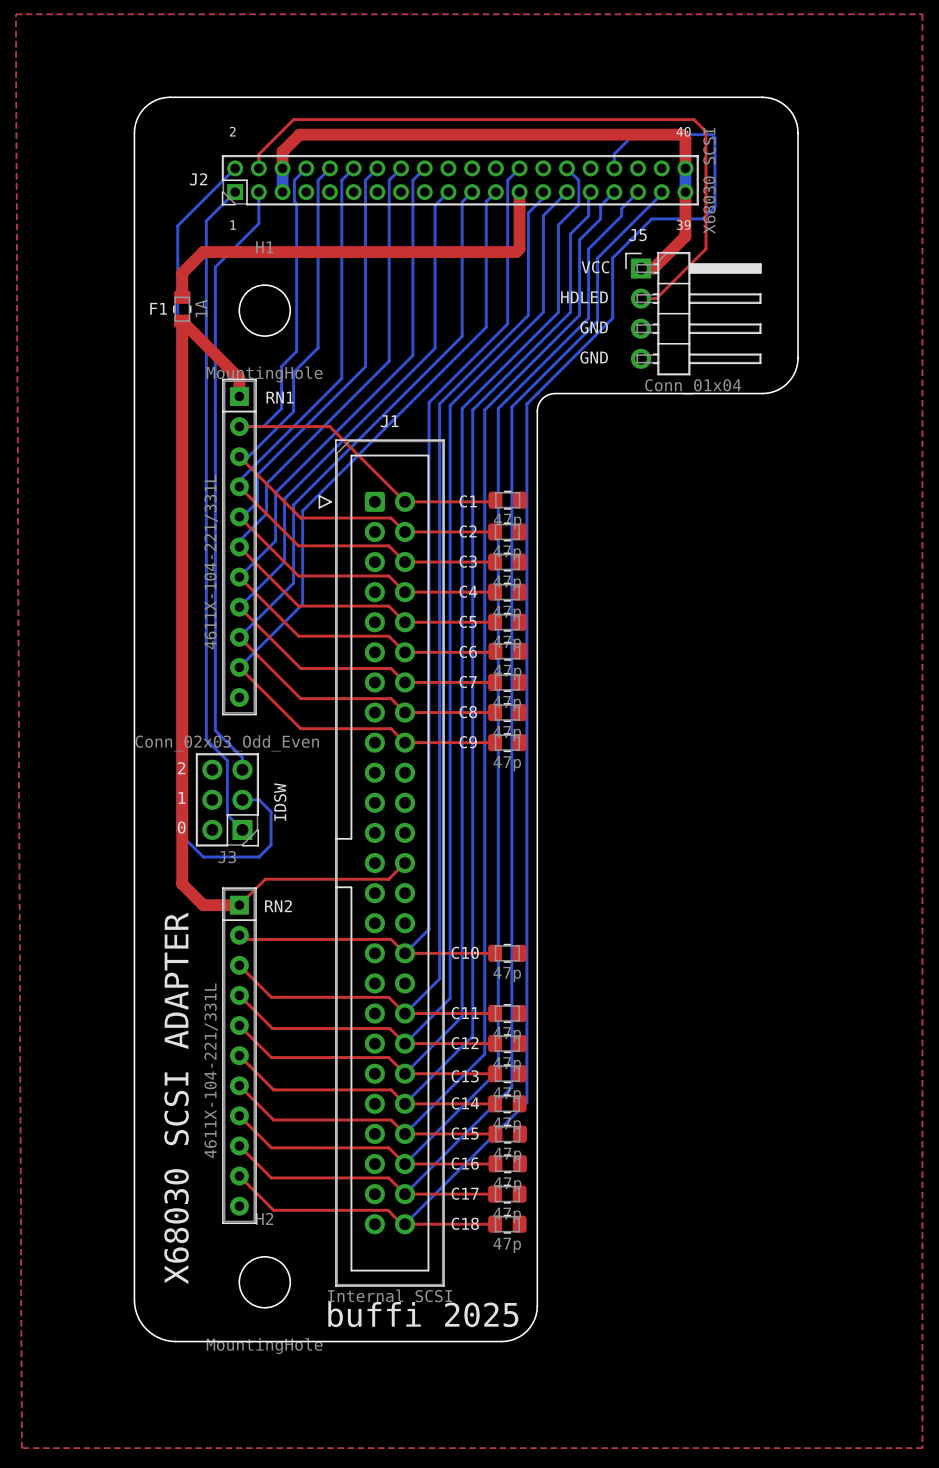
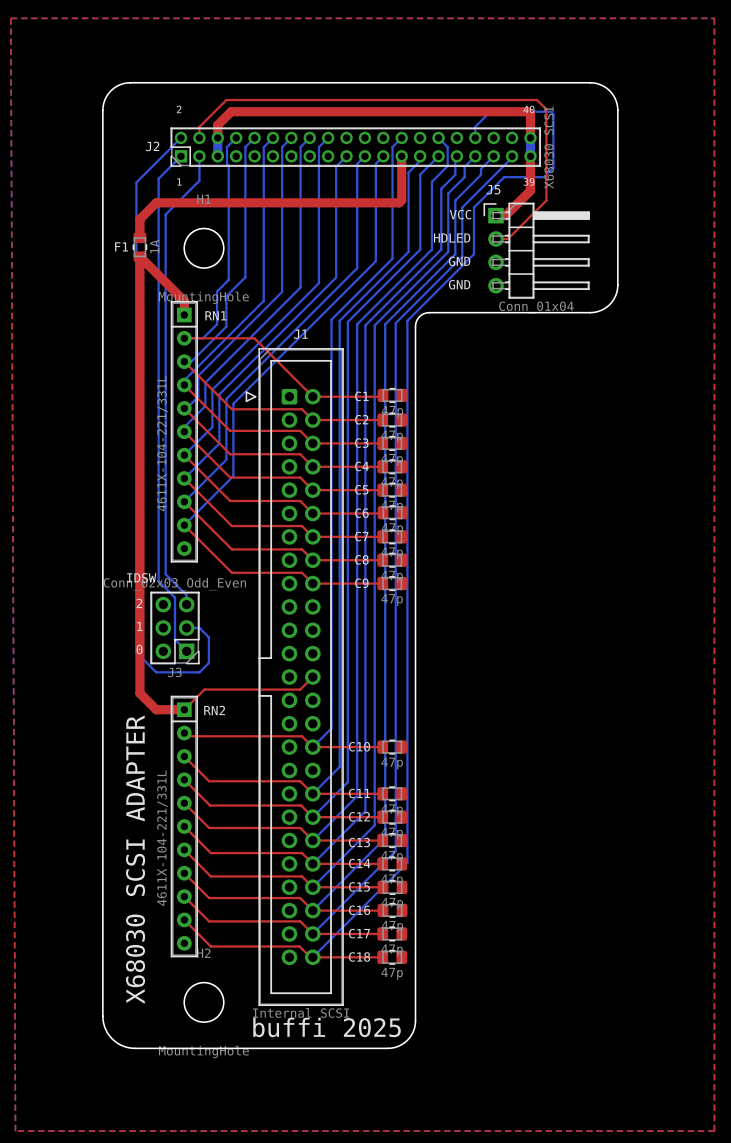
text rotation: 0° (280, 802) -> 90° clockwise (141, 577)
text position: IDSW (280, 802) -> IDSW (141, 577)

